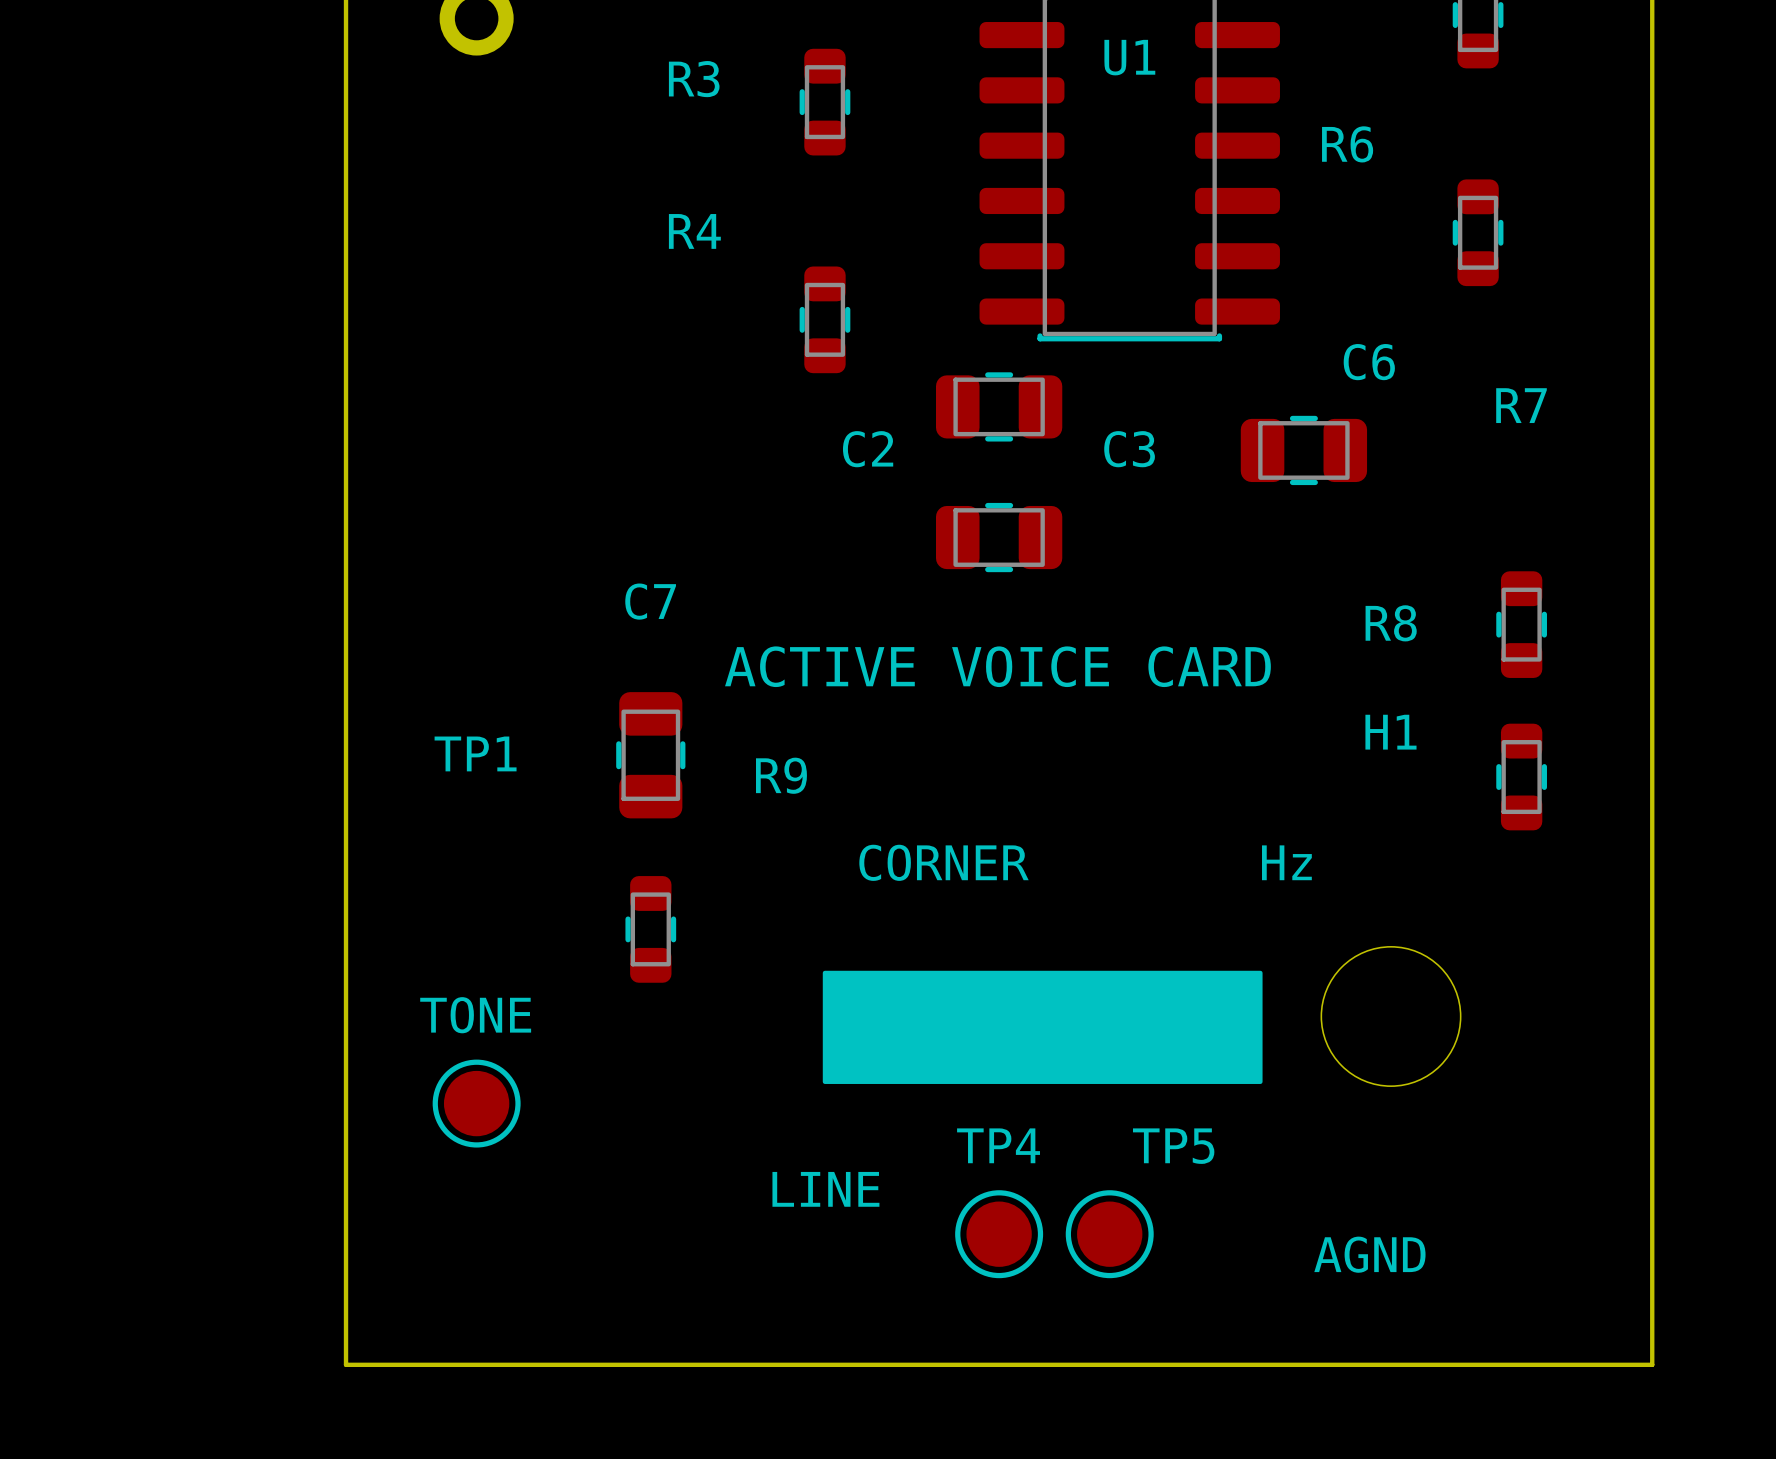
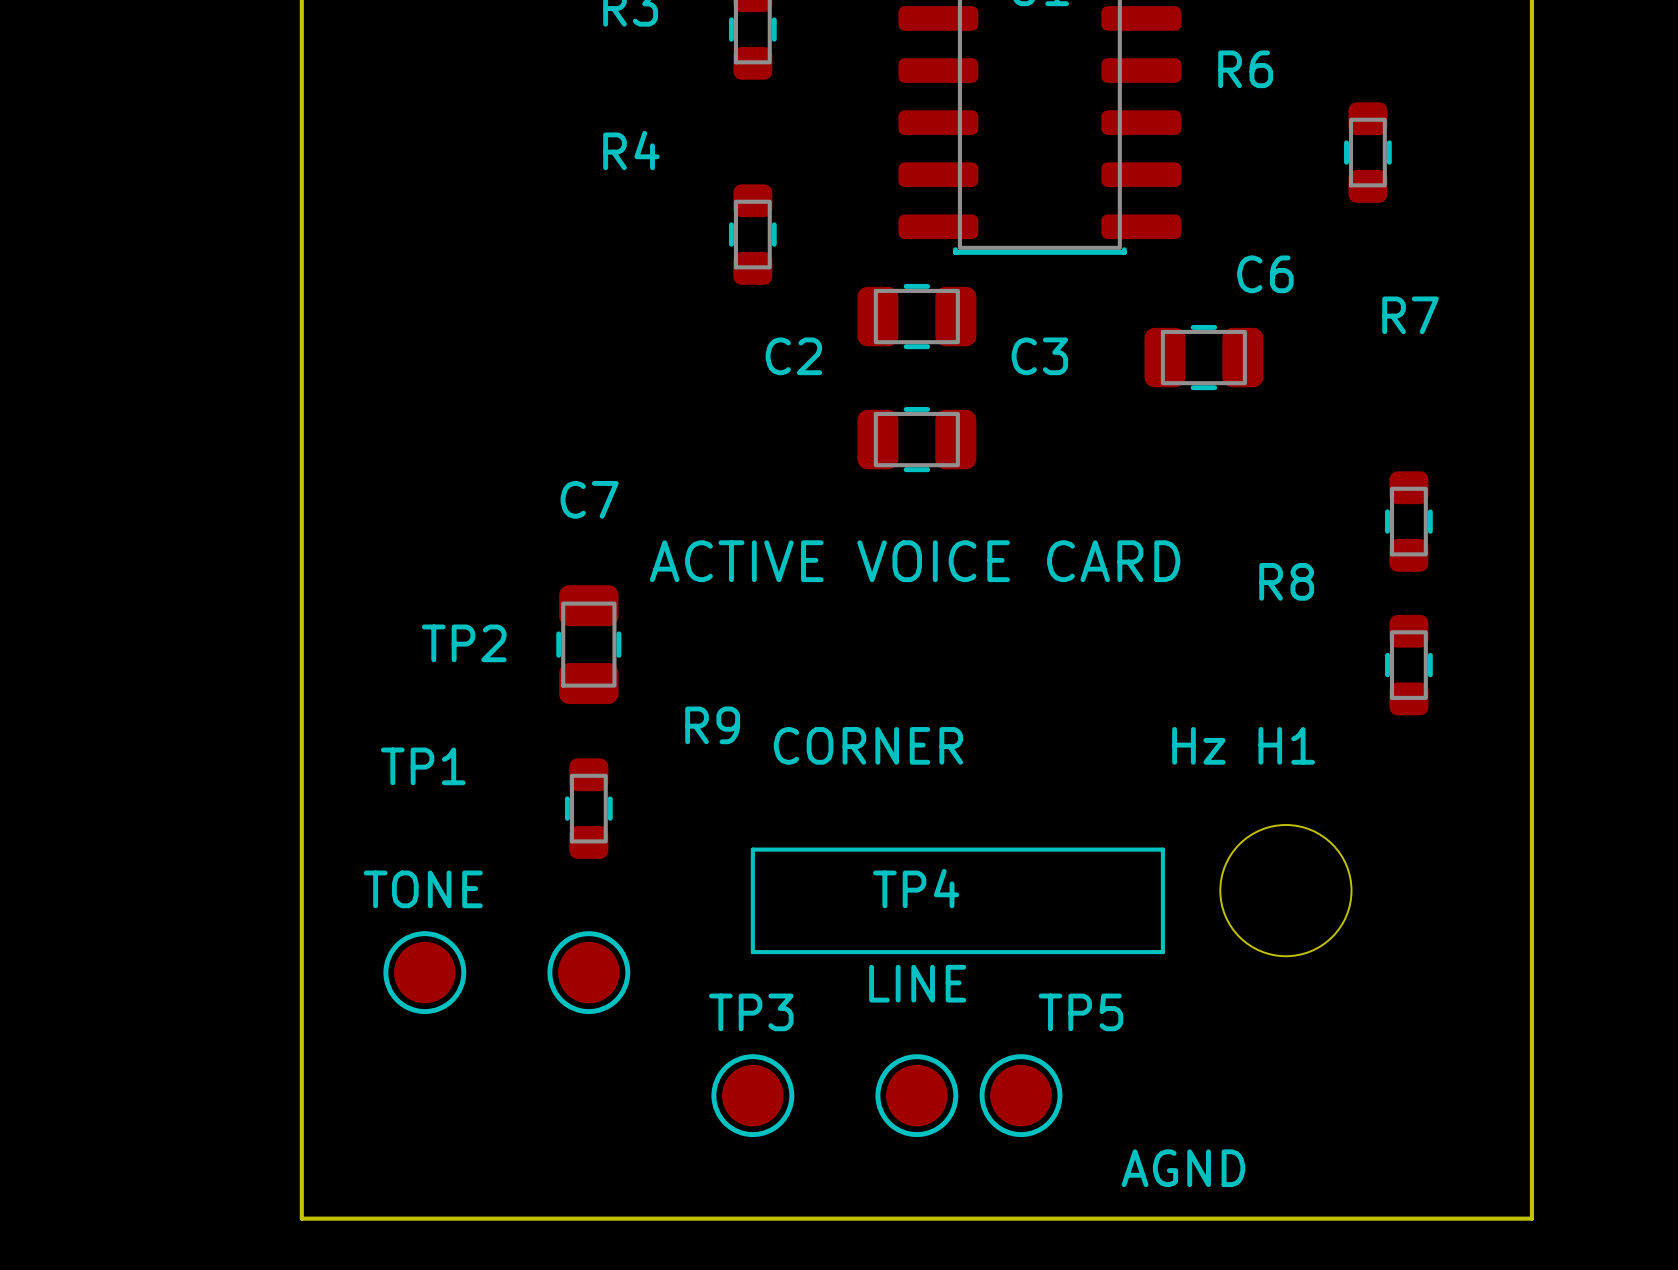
R8 name position: R8 (1391, 623) -> R8 (1286, 581)
H1 name position: H1 (1390, 732) -> H1 (1286, 745)
TP1 name position: TP1 (475, 753) -> TP1 (423, 766)
R9 name position: R9 (781, 775) -> R9 (712, 725)
drawing: [822, 970, 1263, 1084] -> none
line: none -> (752, 849) (1162, 849) (1162, 952) (752, 952) (752, 849)
TP2: none -> (588, 972)
TP4 name position: TP4 (998, 1145) -> TP4 (916, 888)
text position: LINE (825, 1189) -> LINE (917, 983)
TP3: none -> (752, 1095)
text position: AGND (1369, 1254) -> AGND (1183, 1168)

